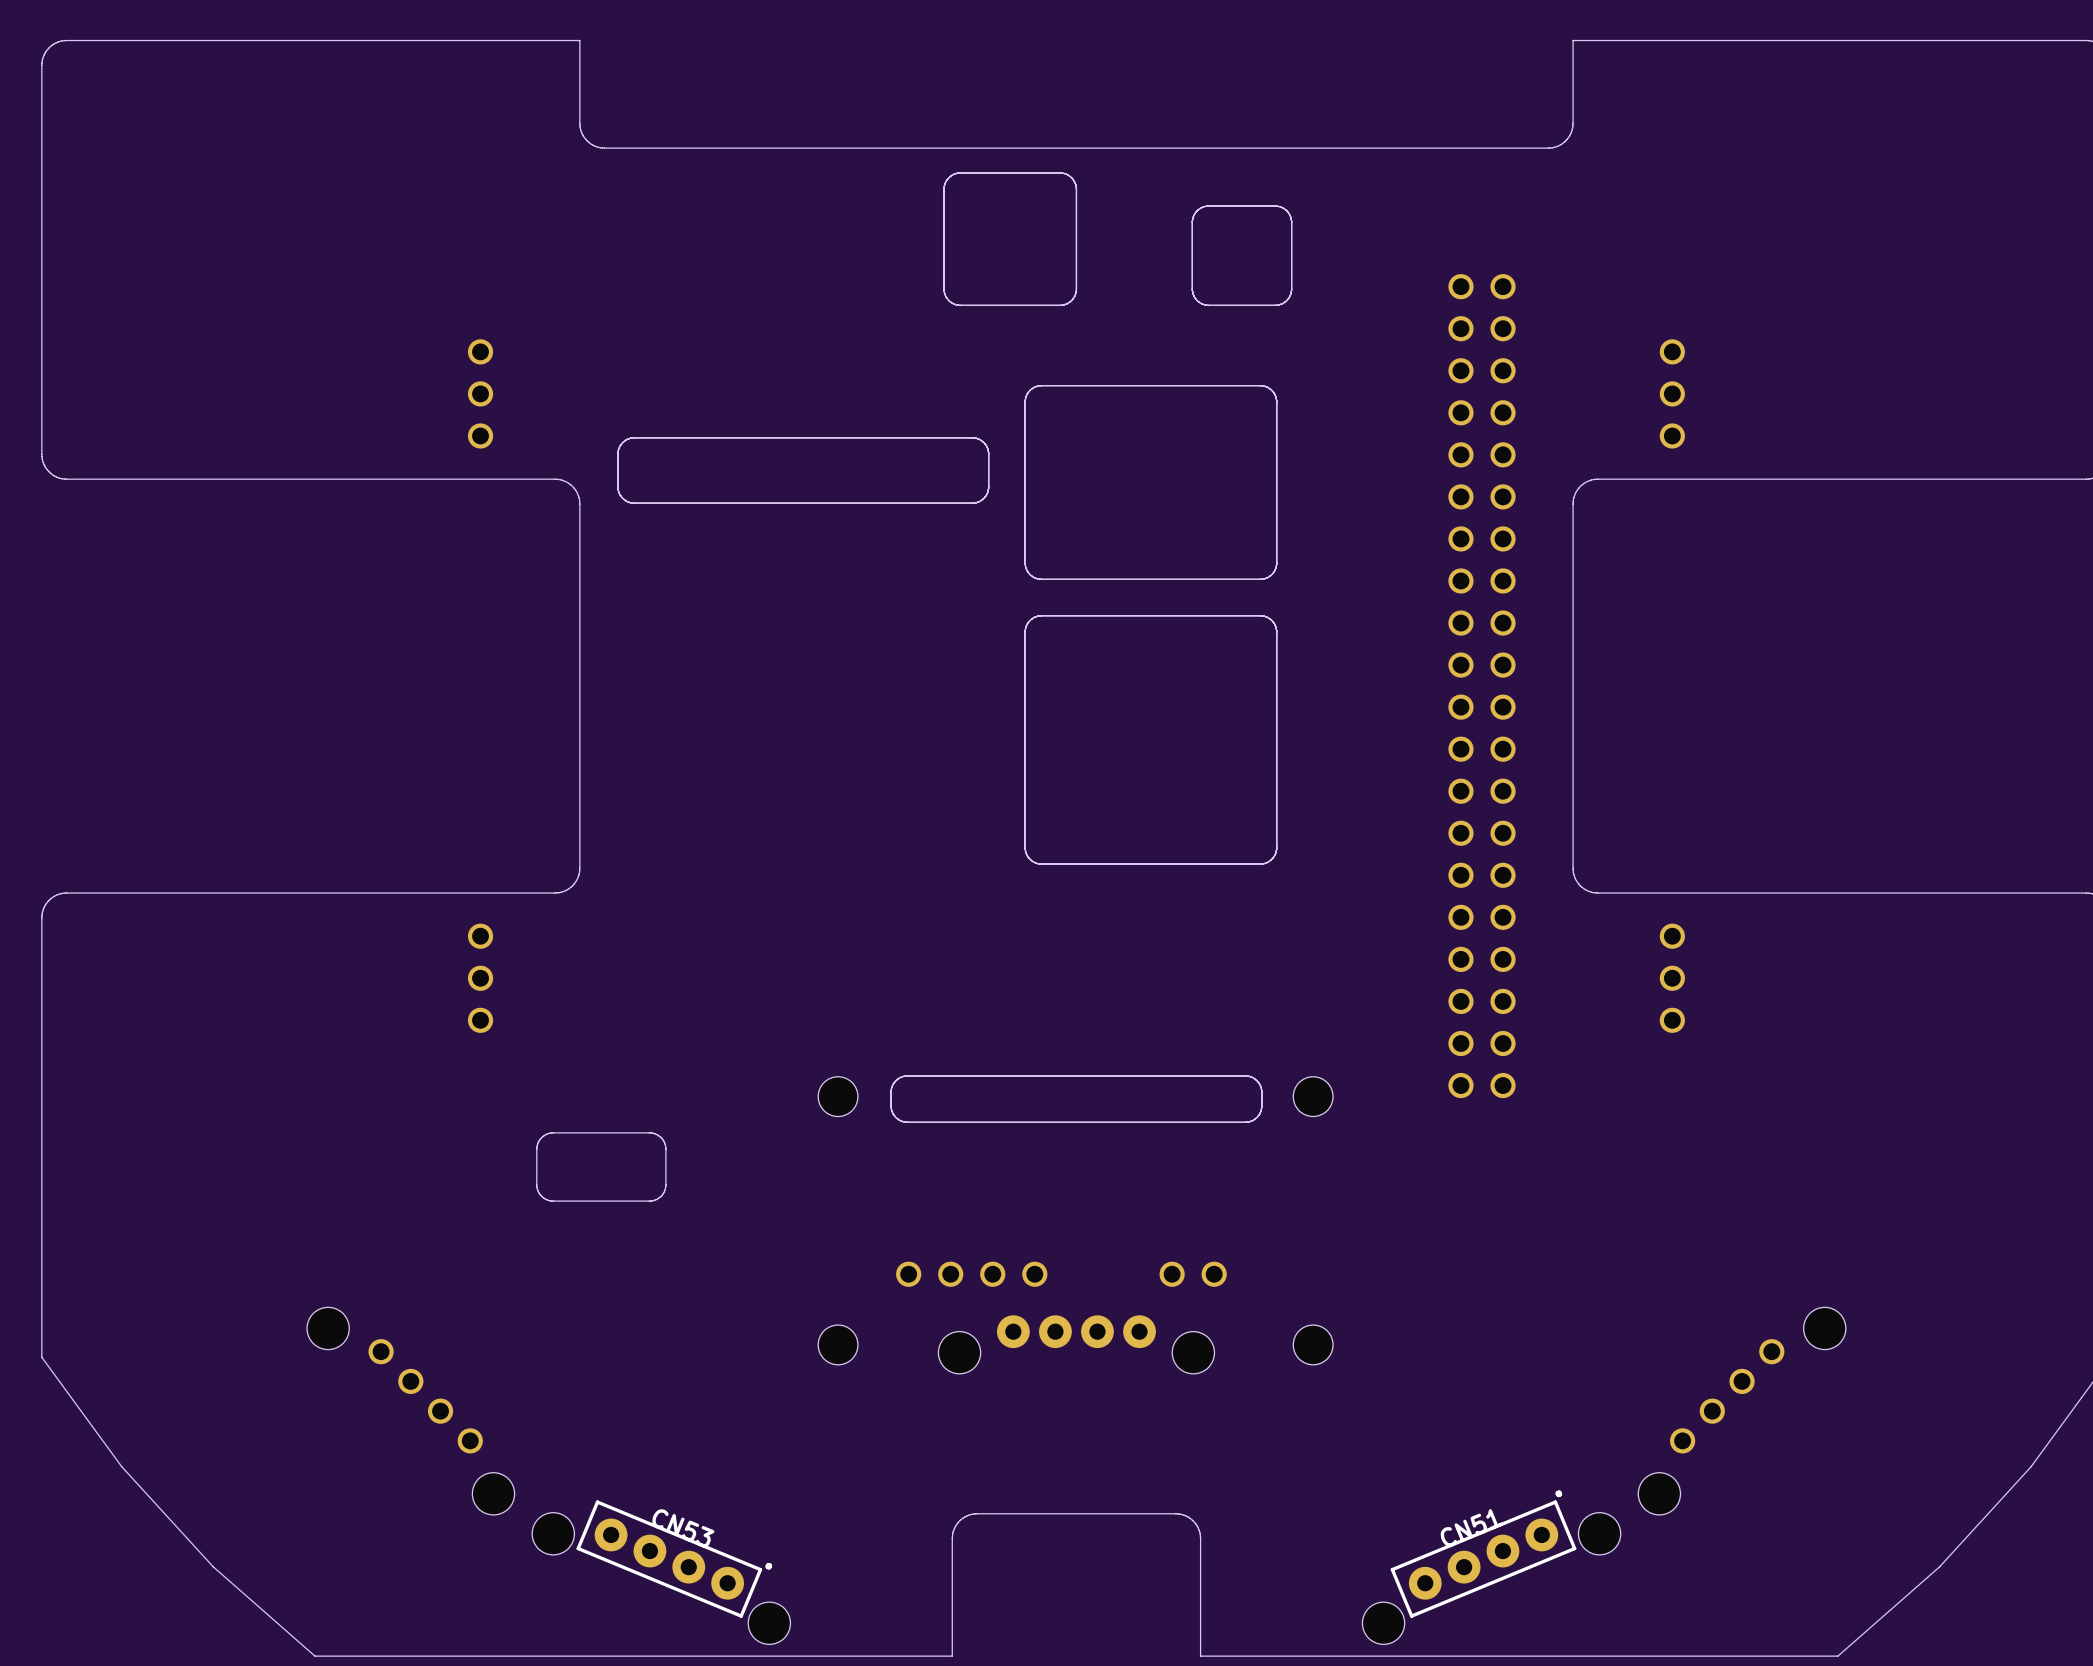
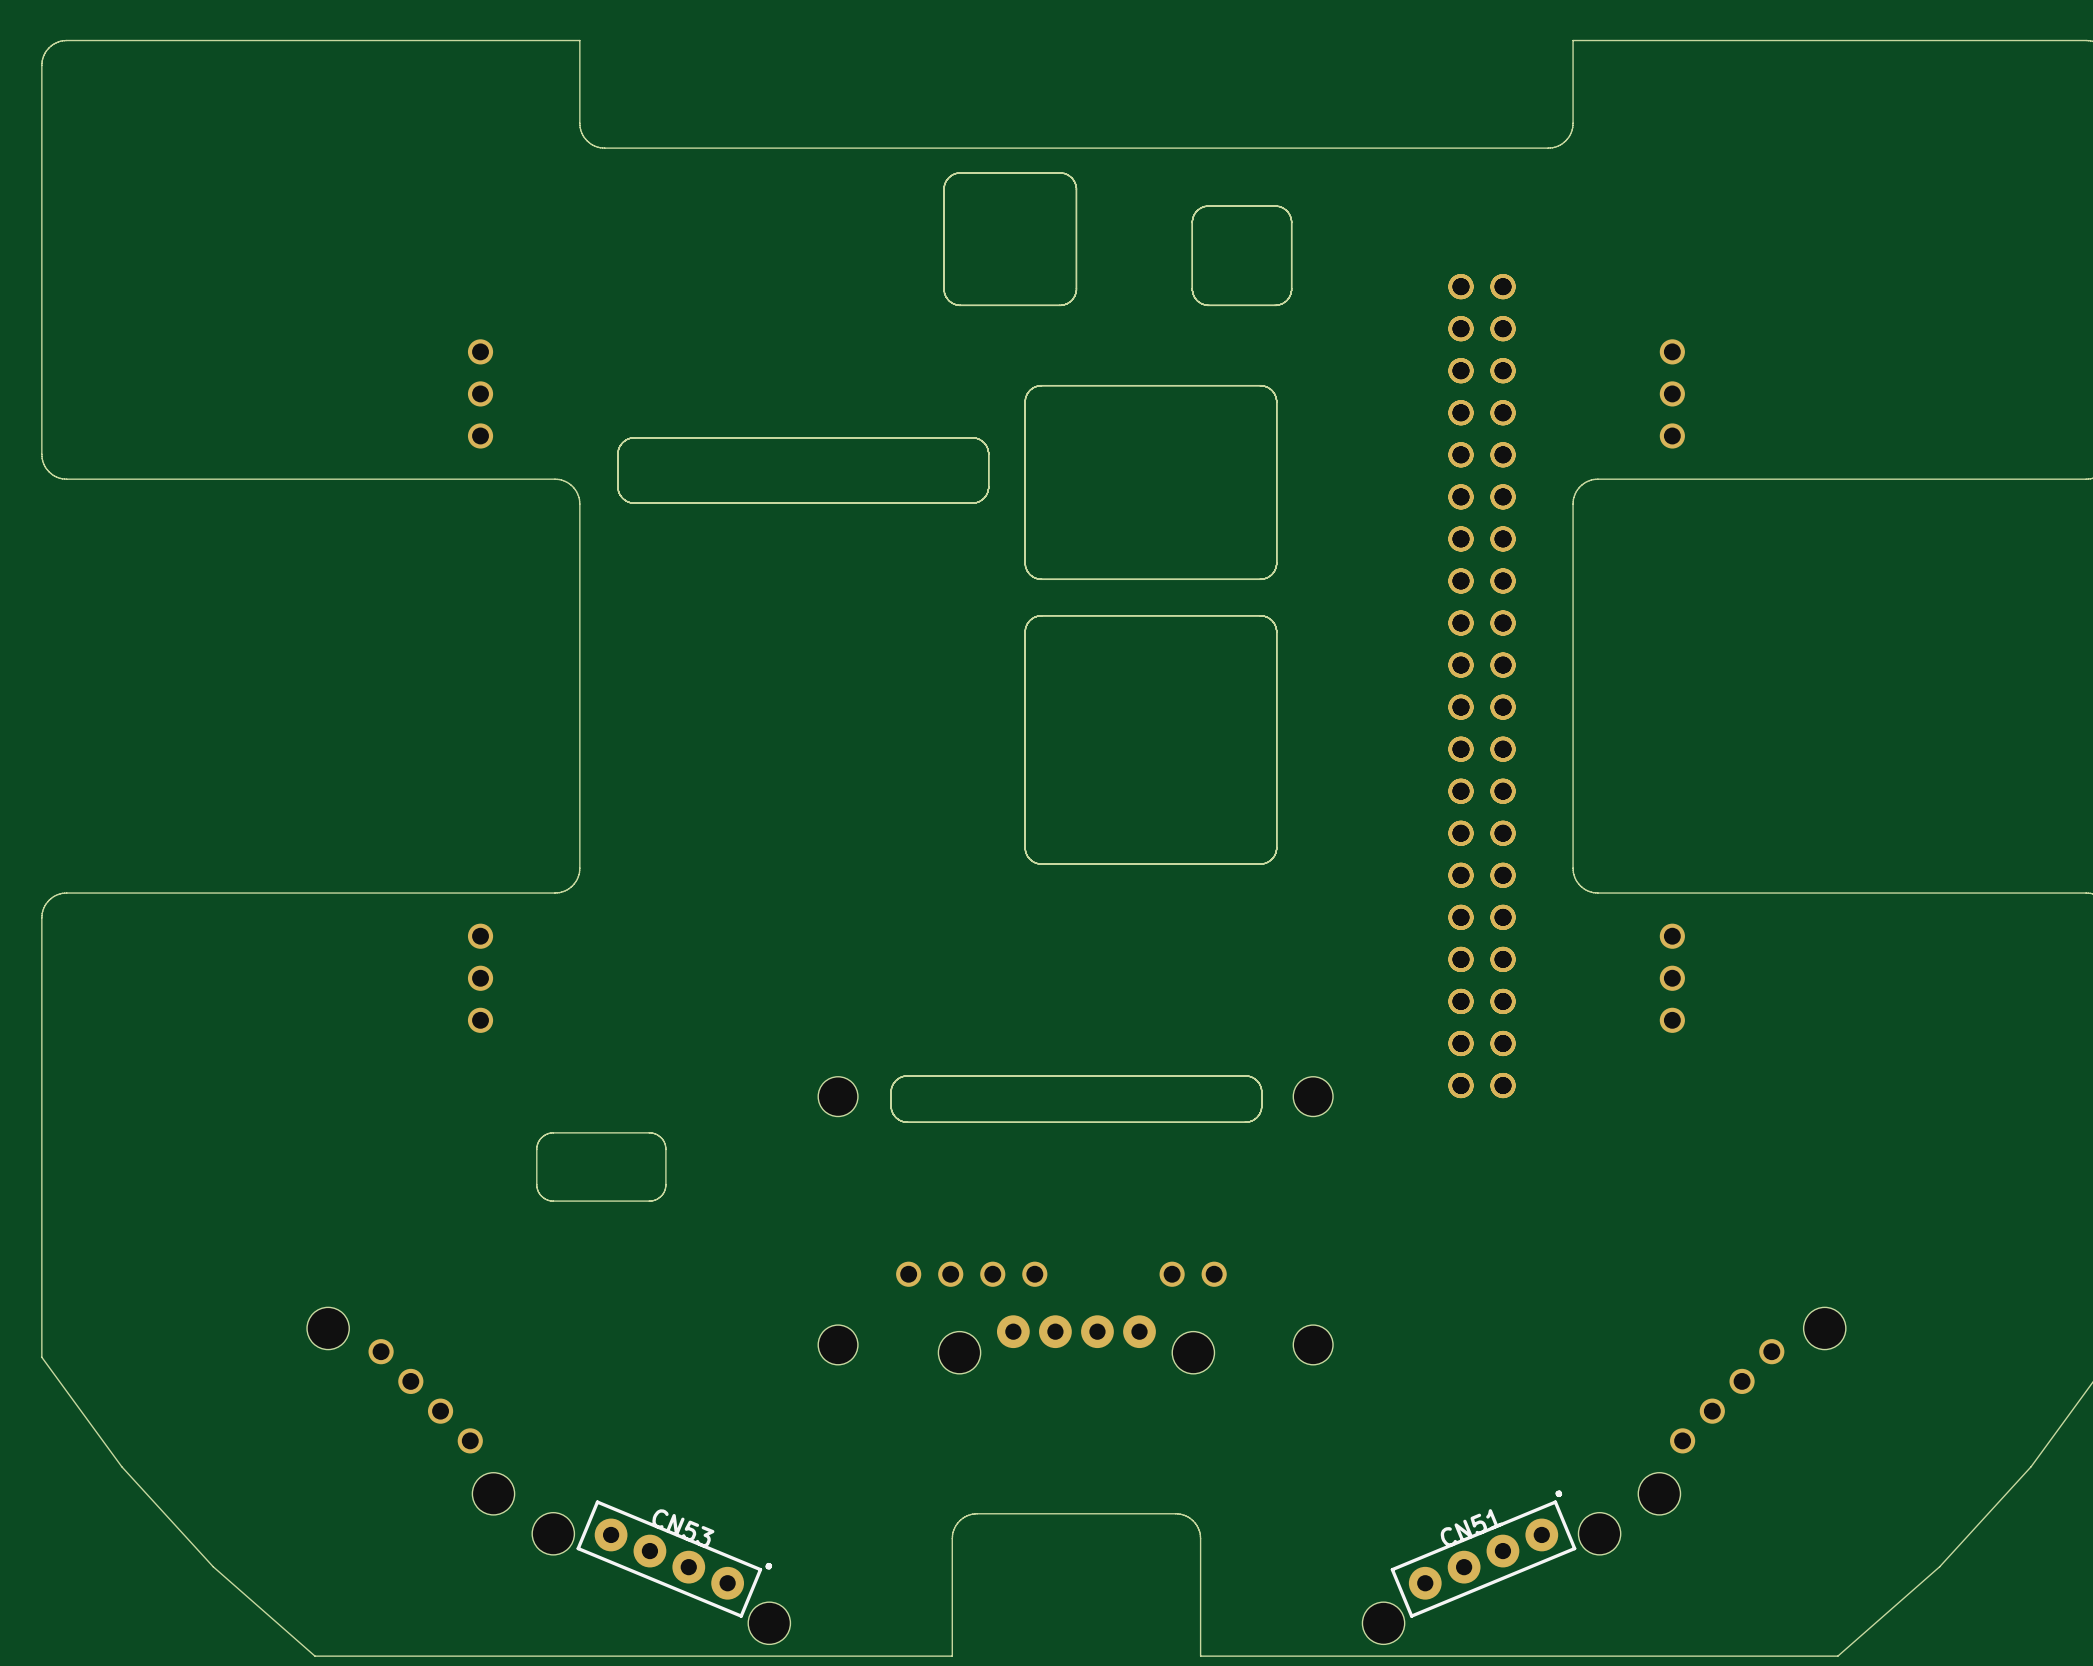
part: none -> (1482, 686)

